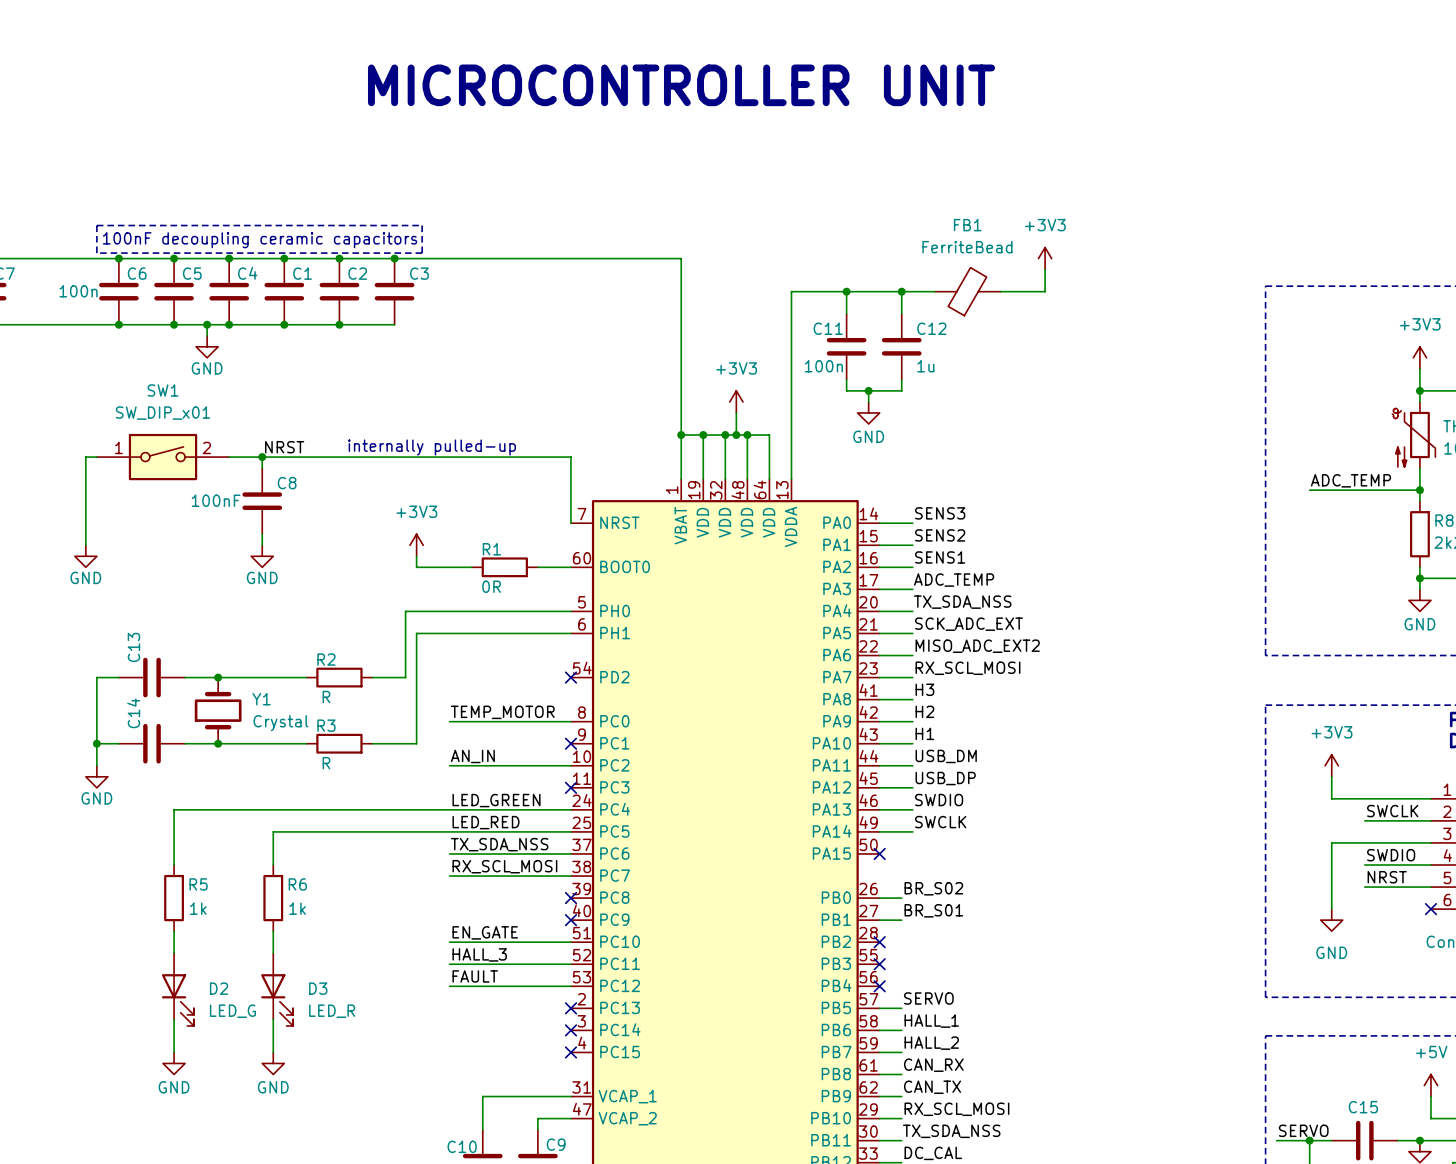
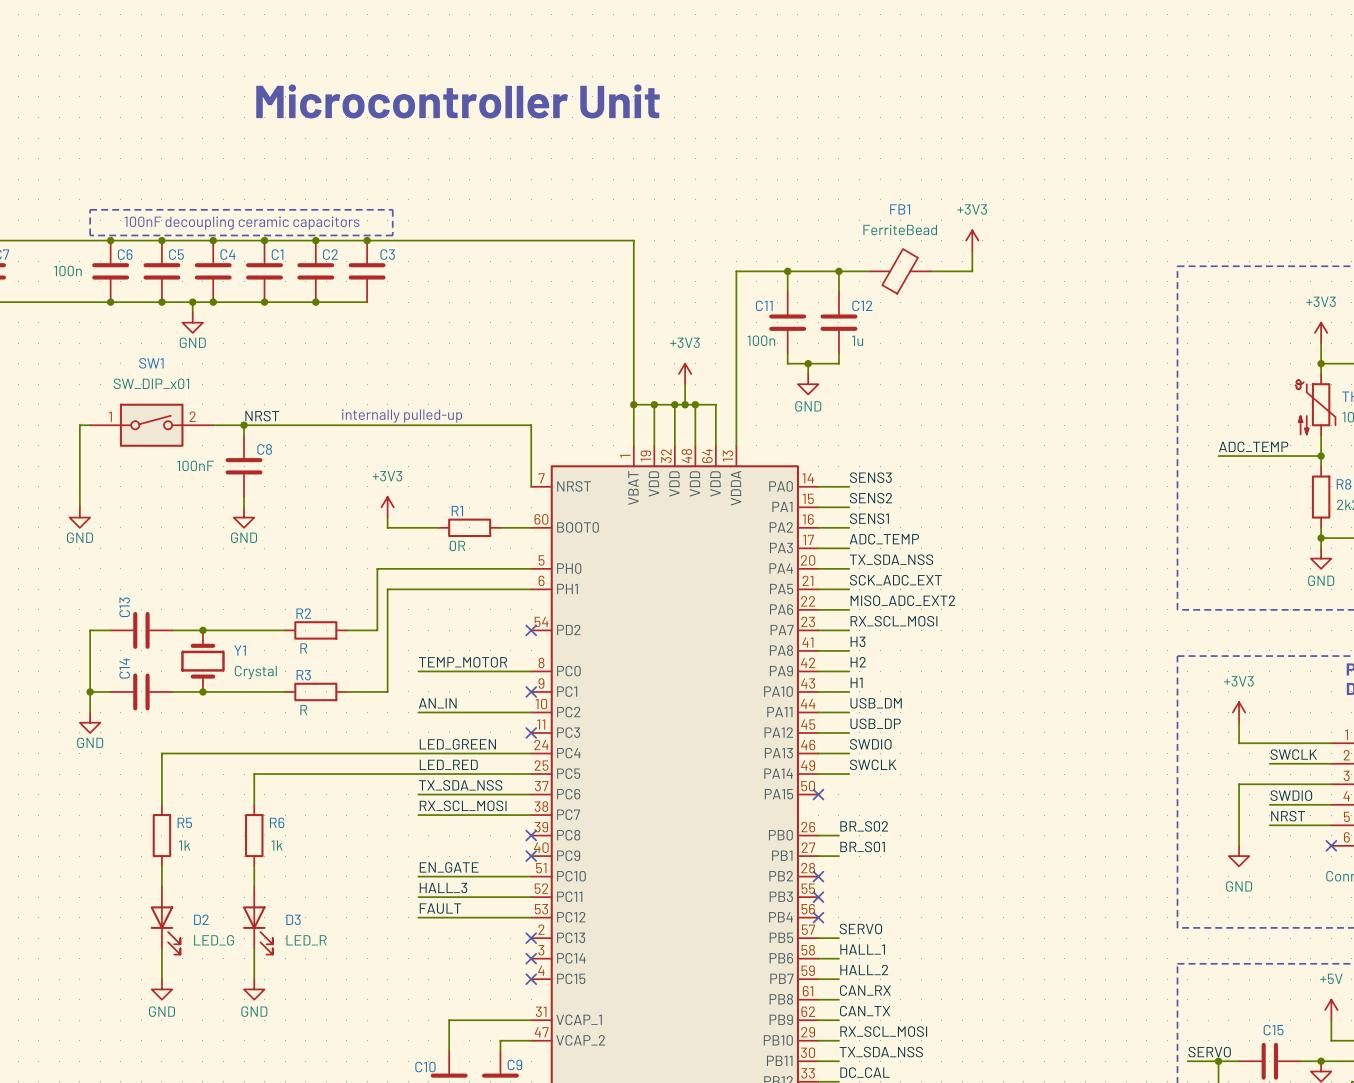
text: MICROCONTROLLER UNIT (681, 85) -> none
text: none -> Microcontroller Unit (458, 101)

